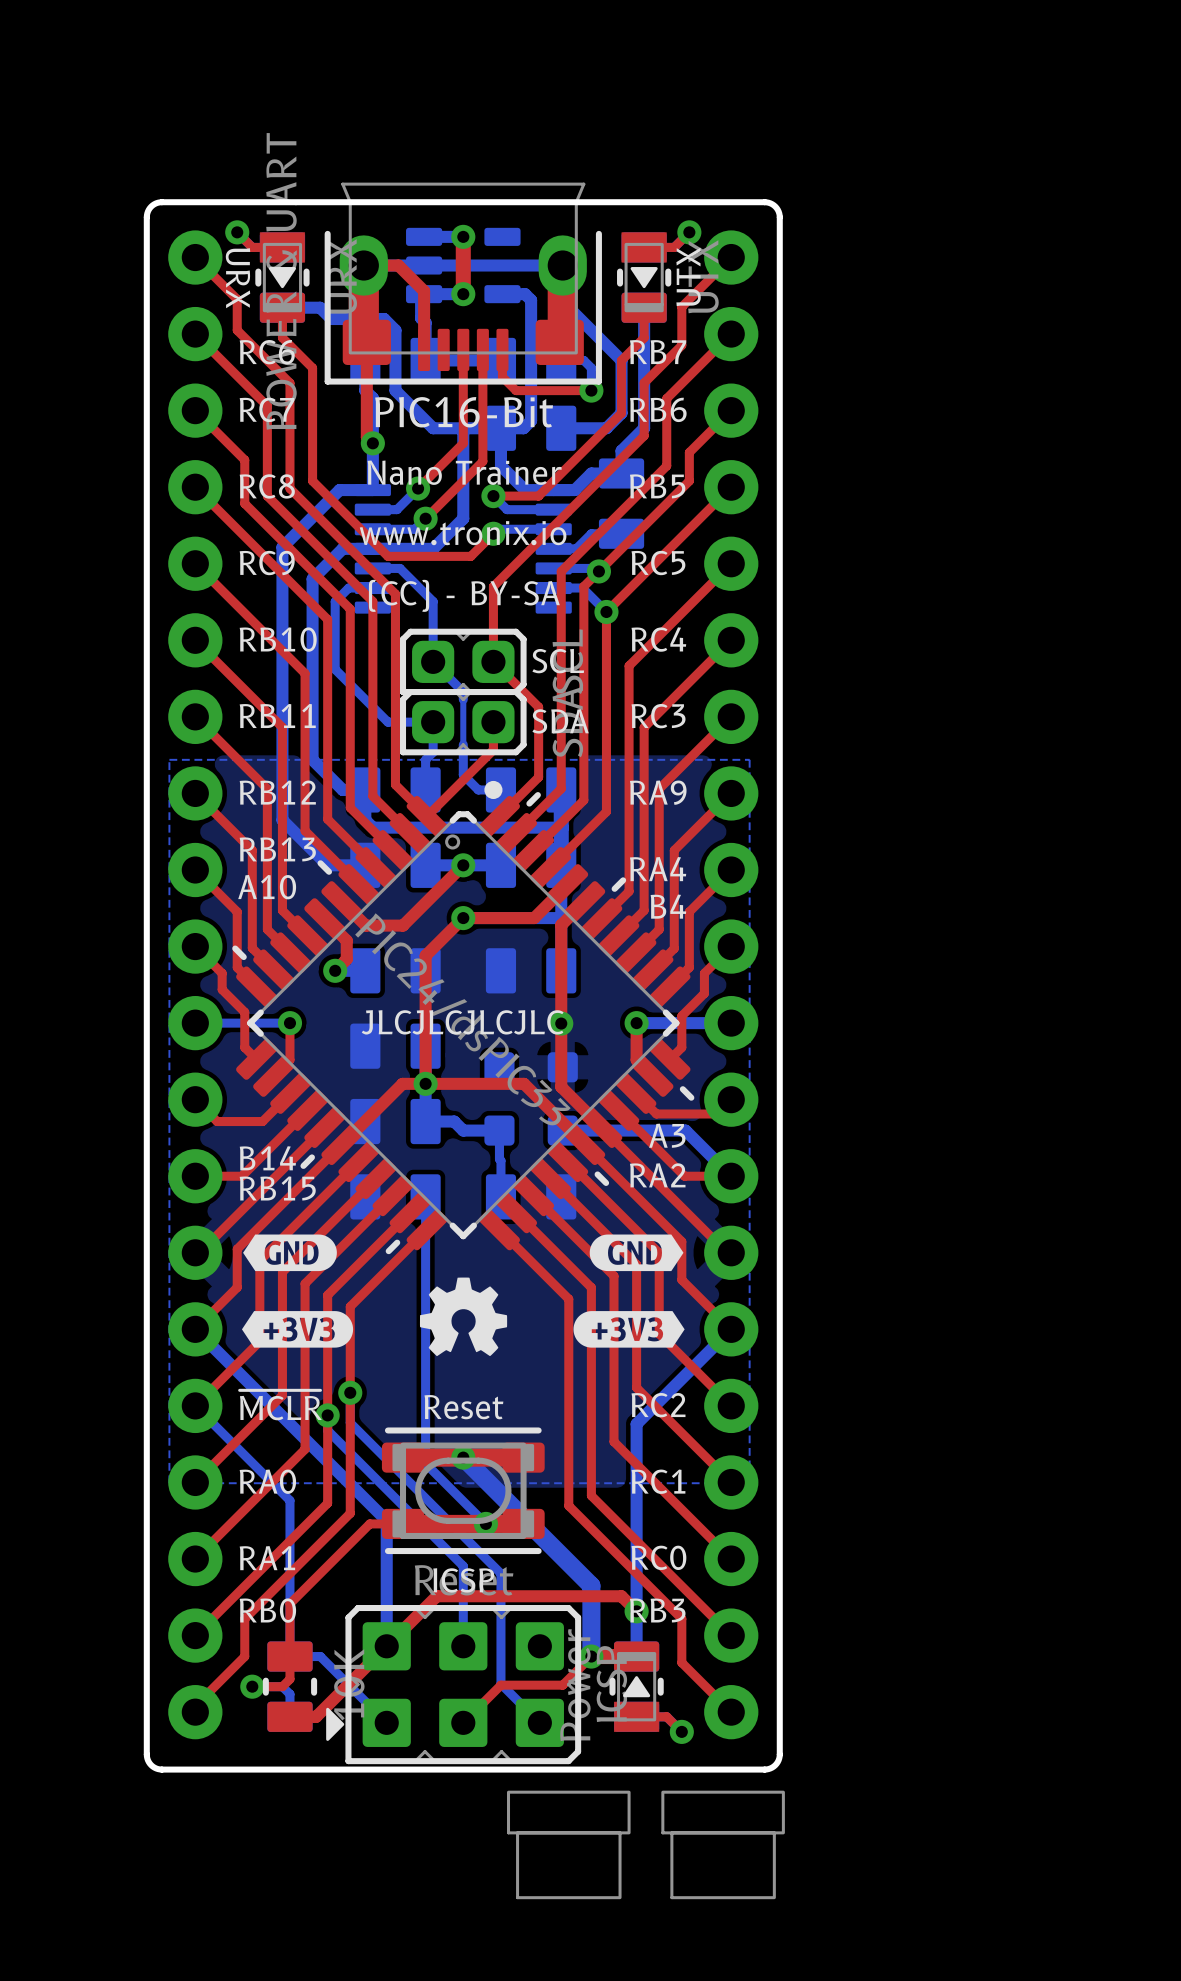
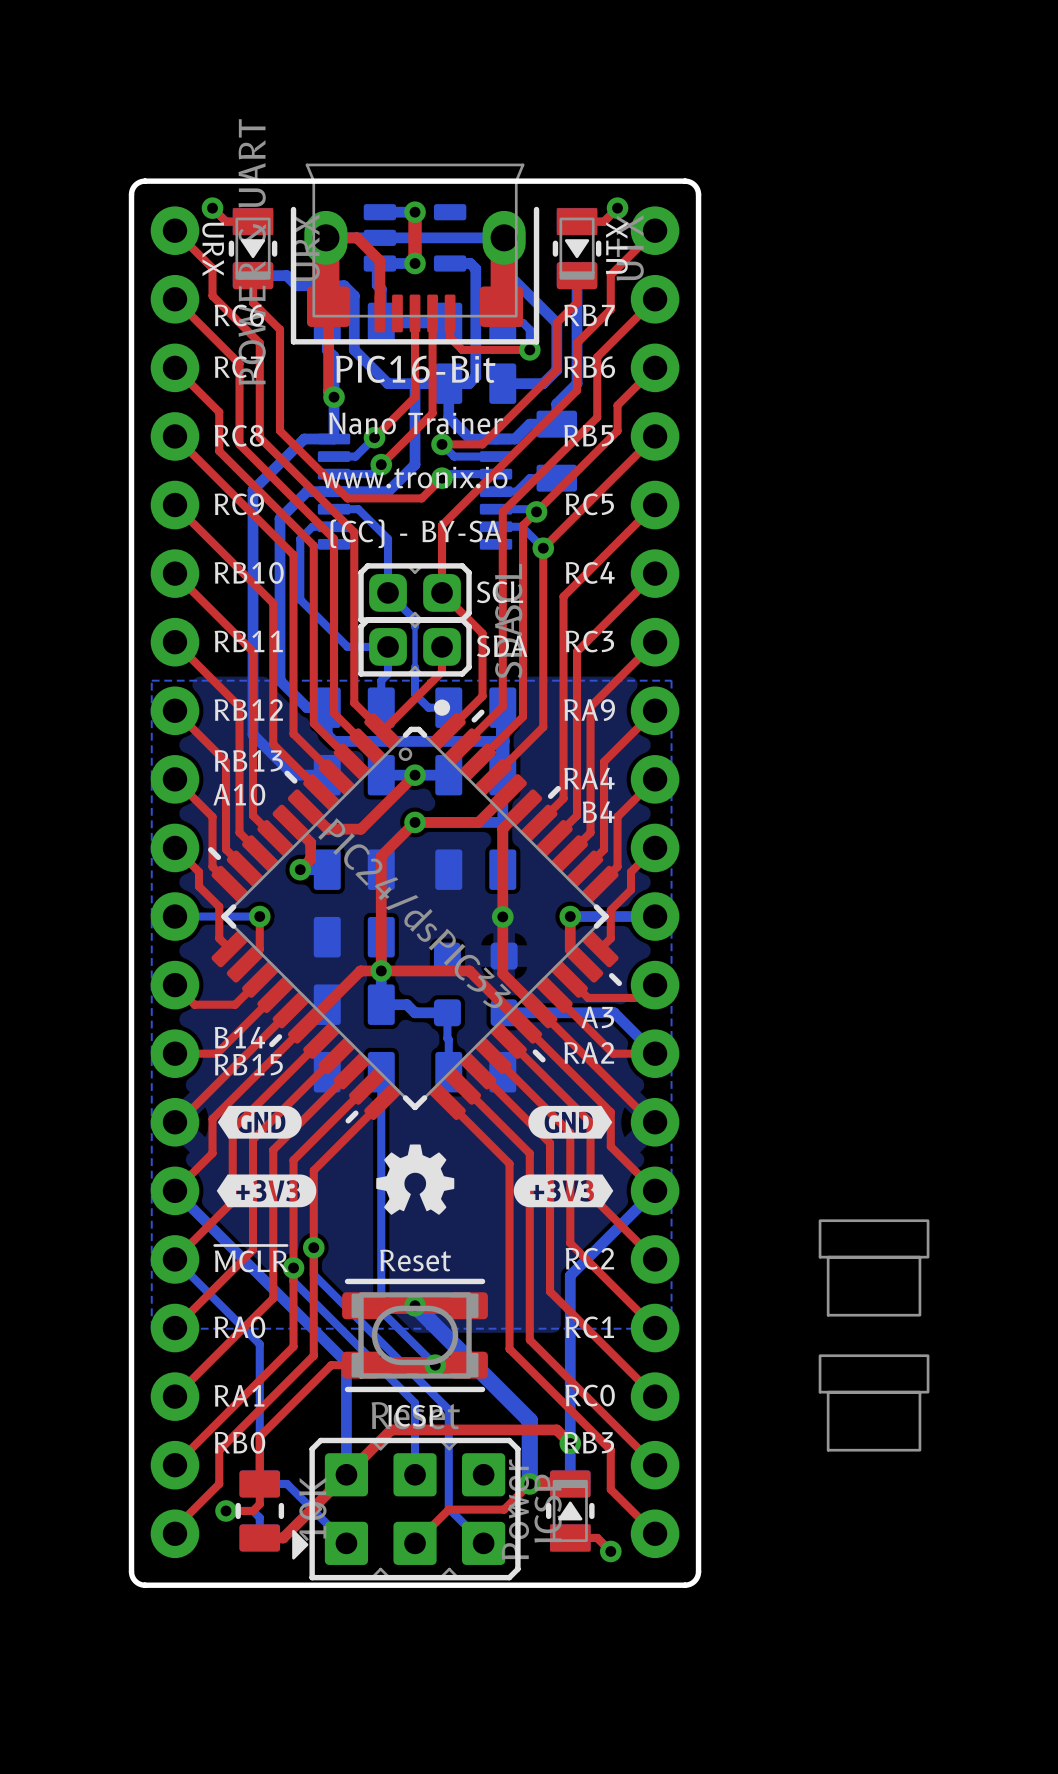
text: JLCJLCJLCJLC (462, 1022) -> none
drawing: none -> [818, 1219, 930, 1317]
drawing: none -> [818, 1354, 930, 1452]
drawing: [507, 1790, 785, 1900] -> none

